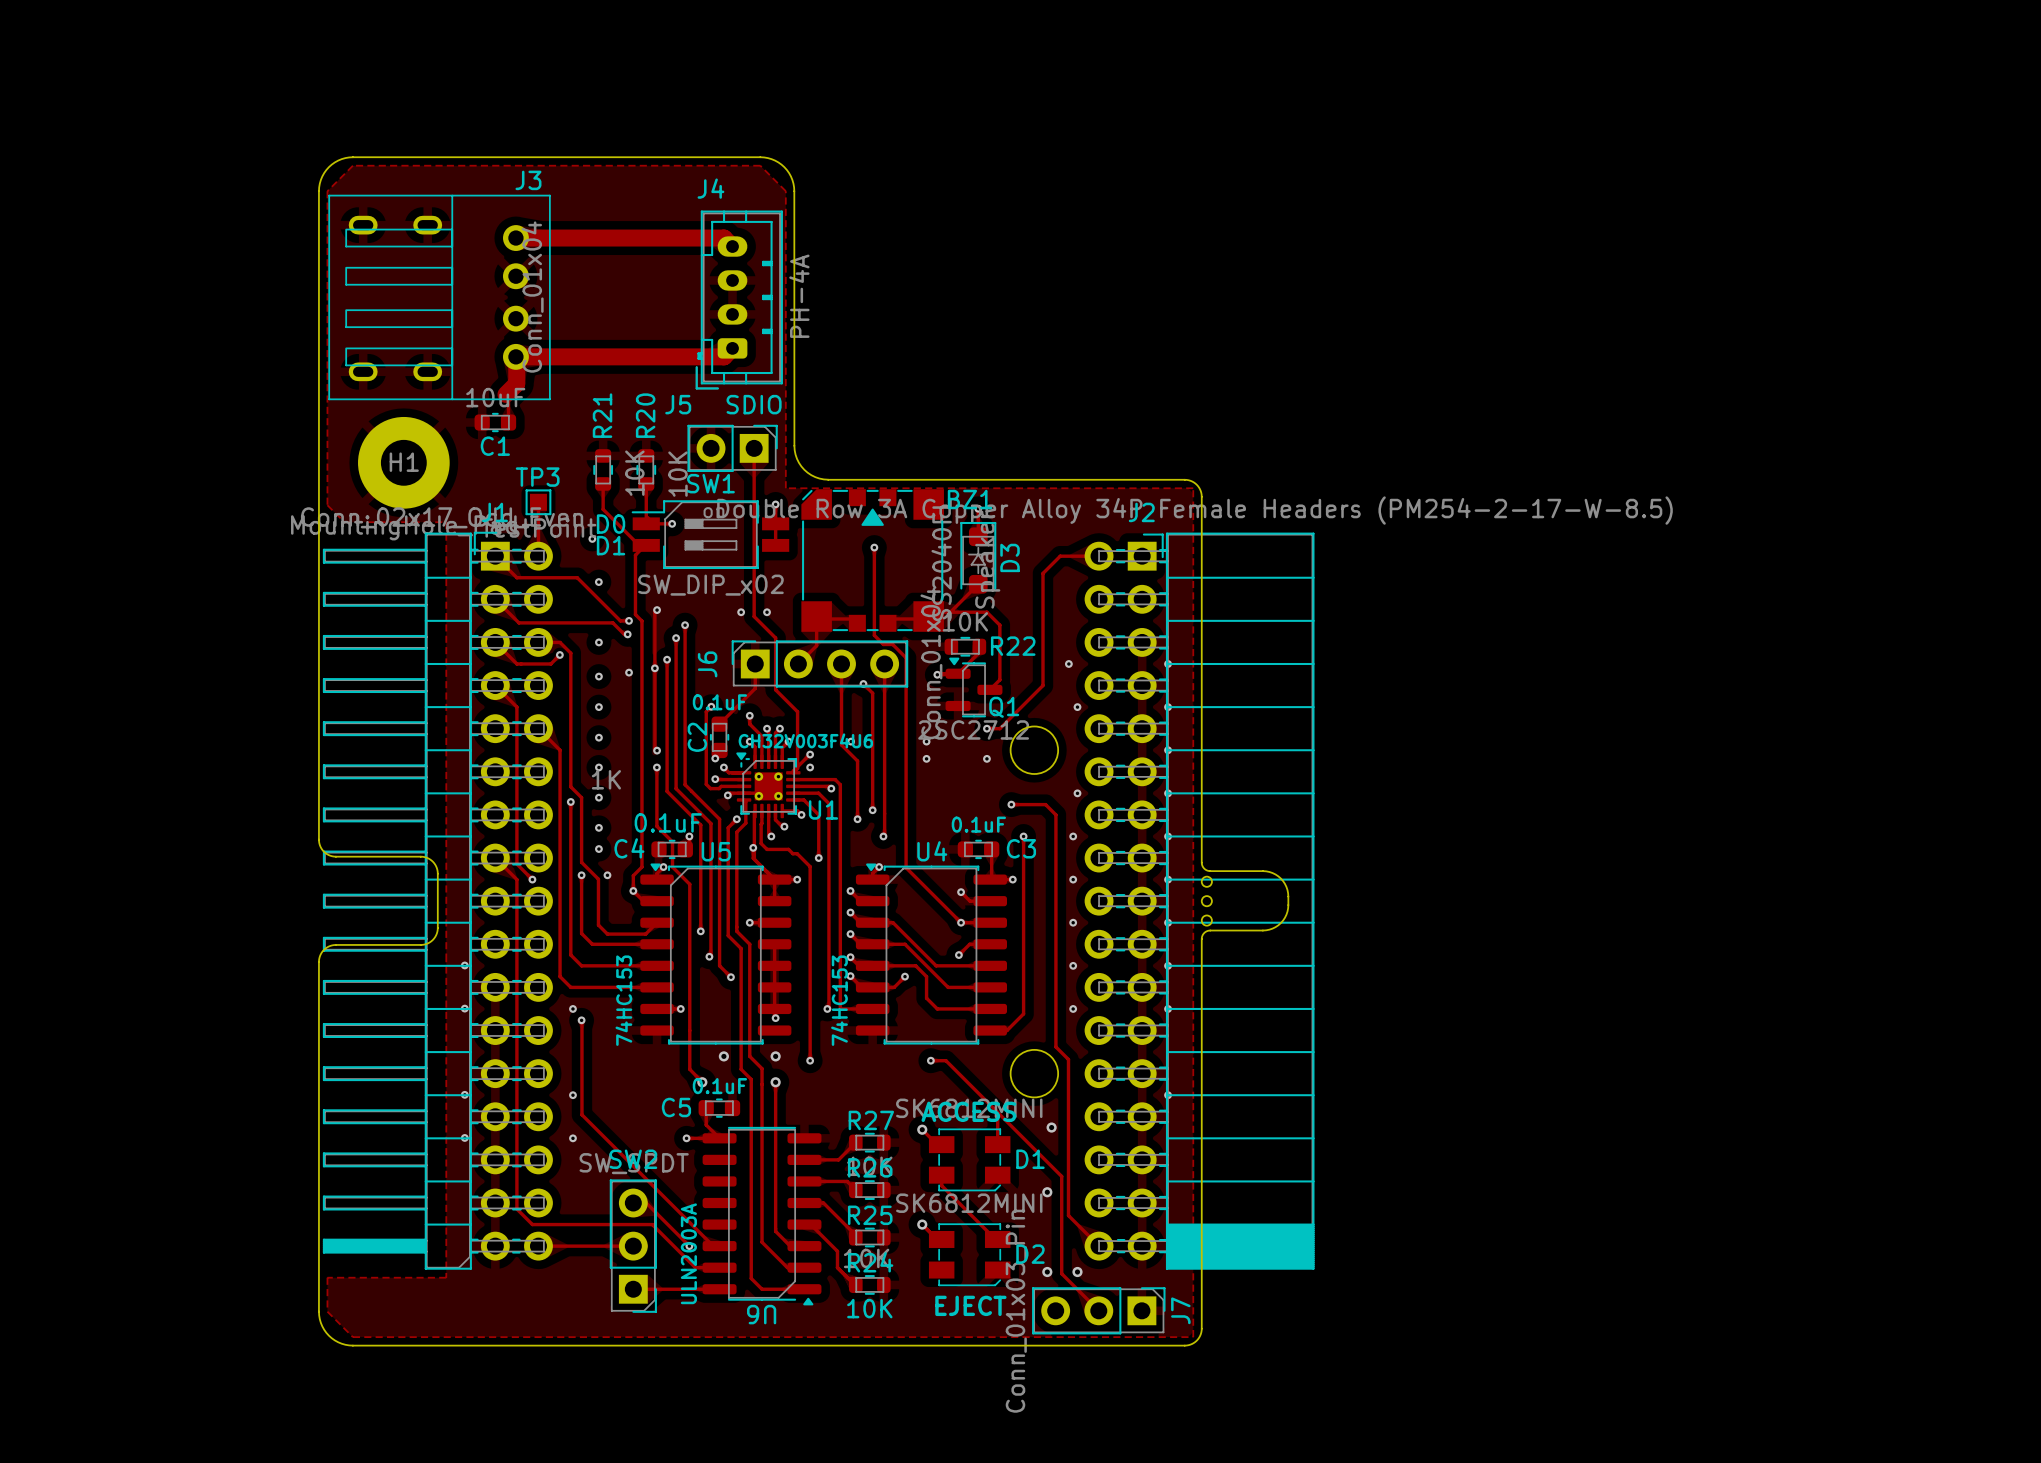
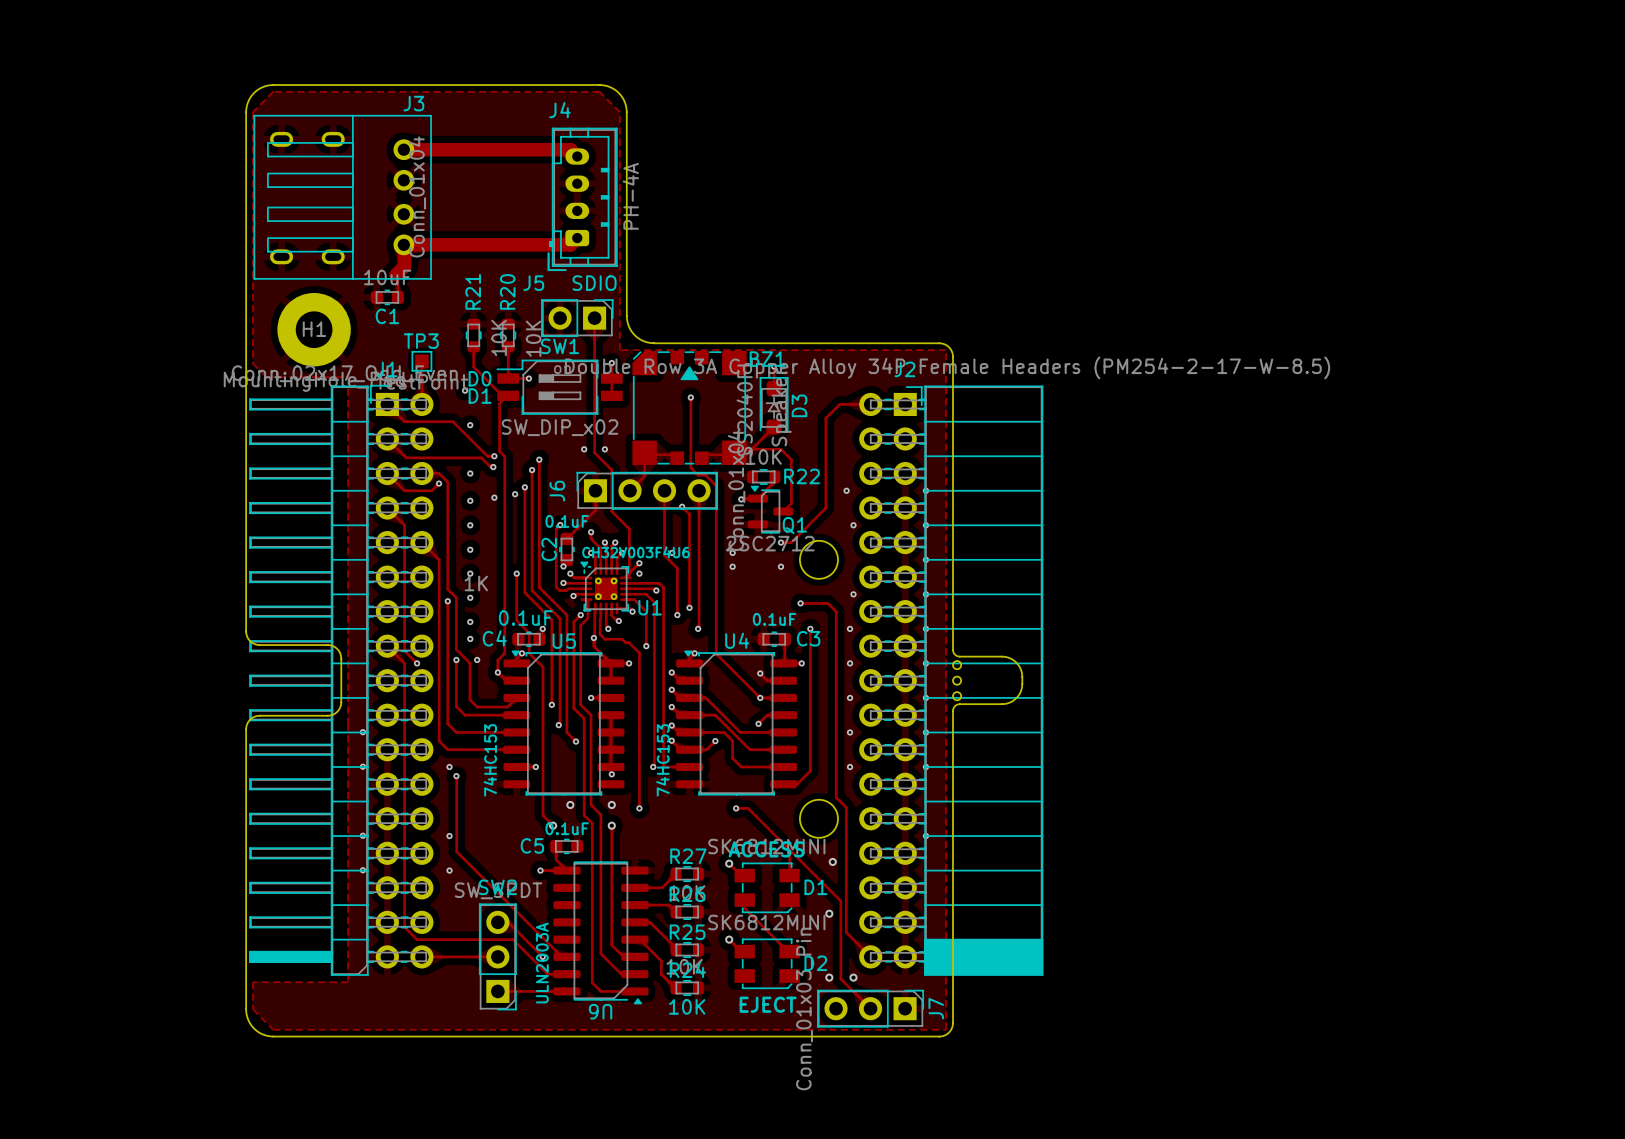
track: (657, 610) (654, 612) (654, 748) (657, 750) -> none
via: (657, 610) -> none
via: (657, 750) -> none

